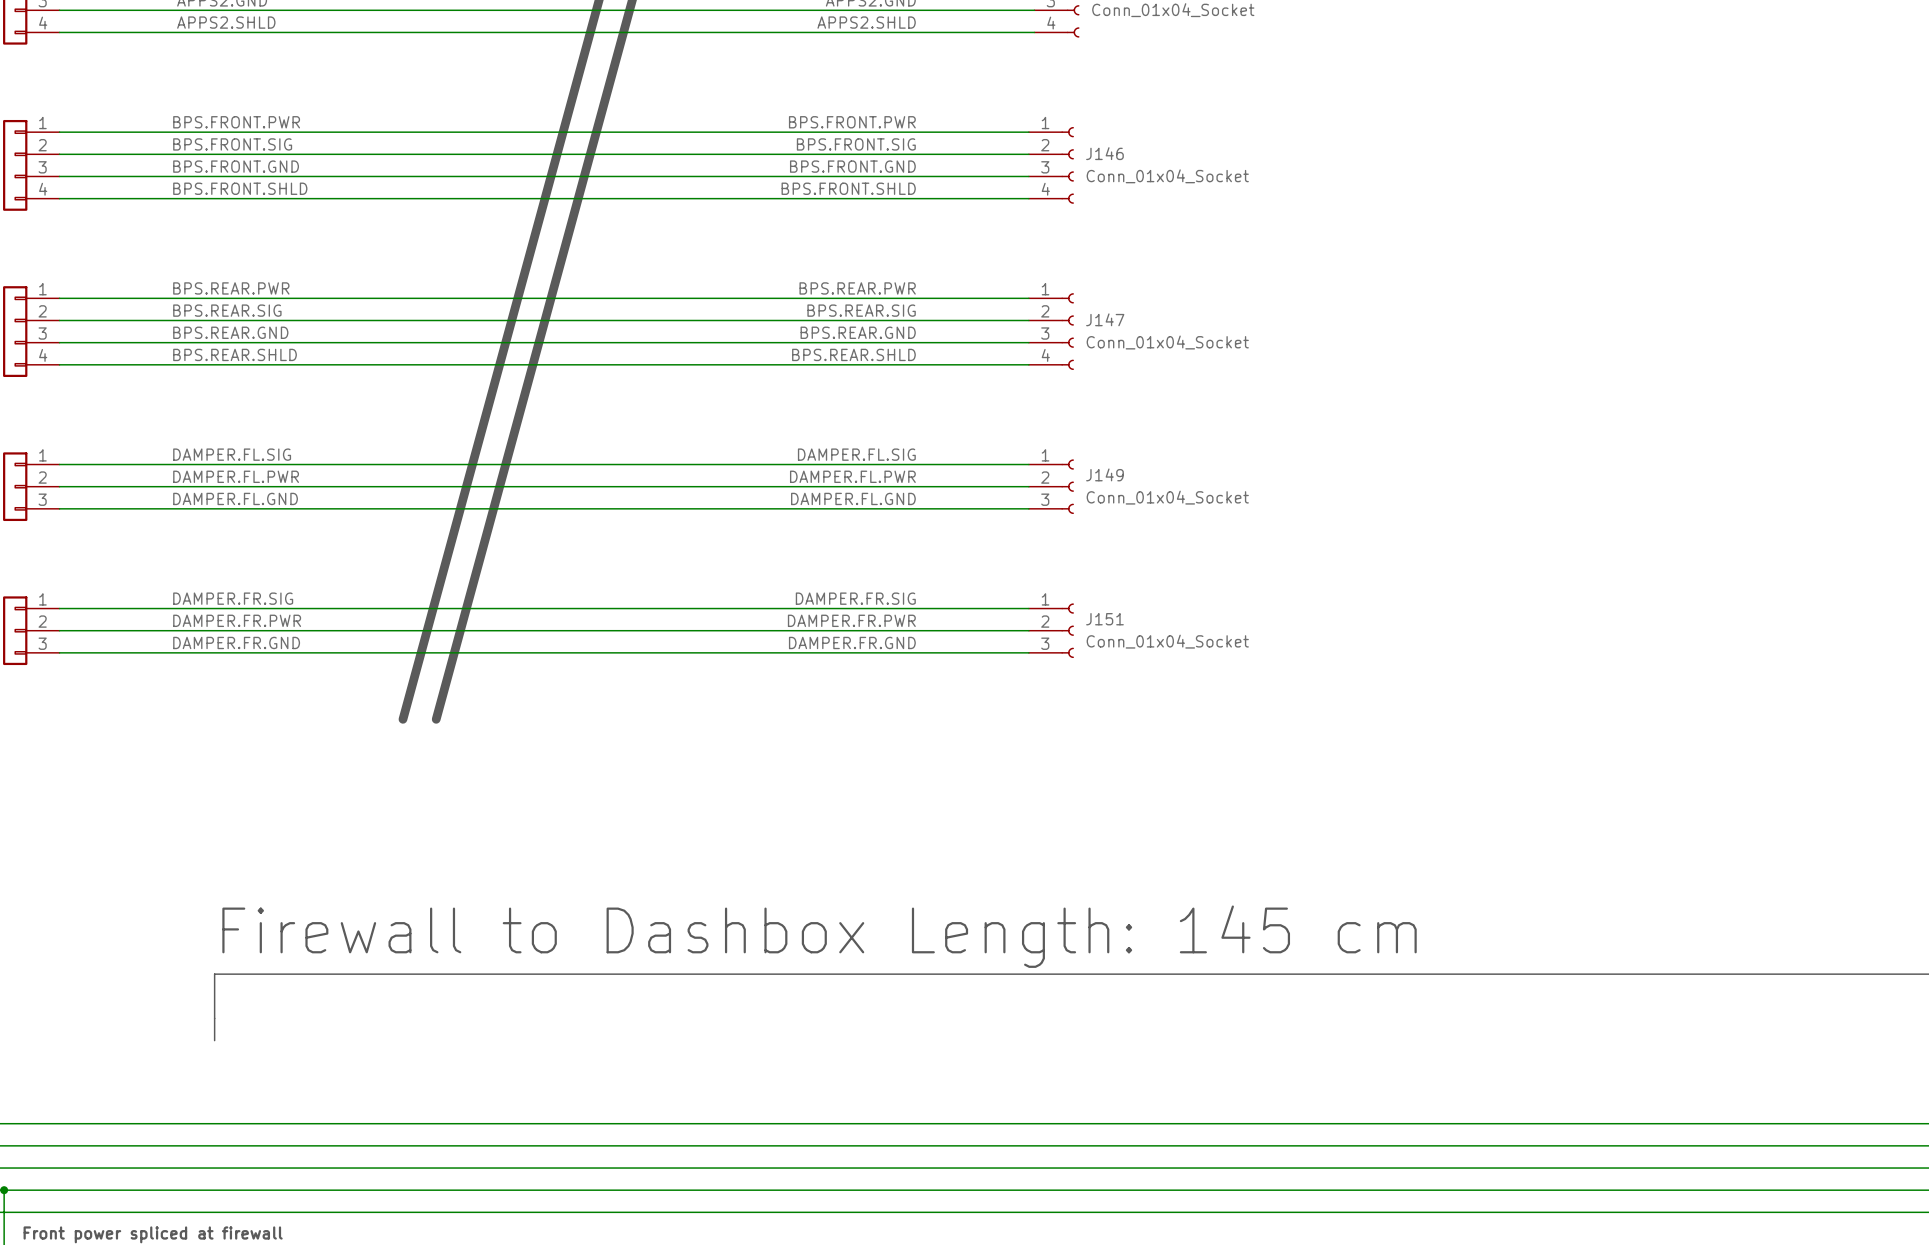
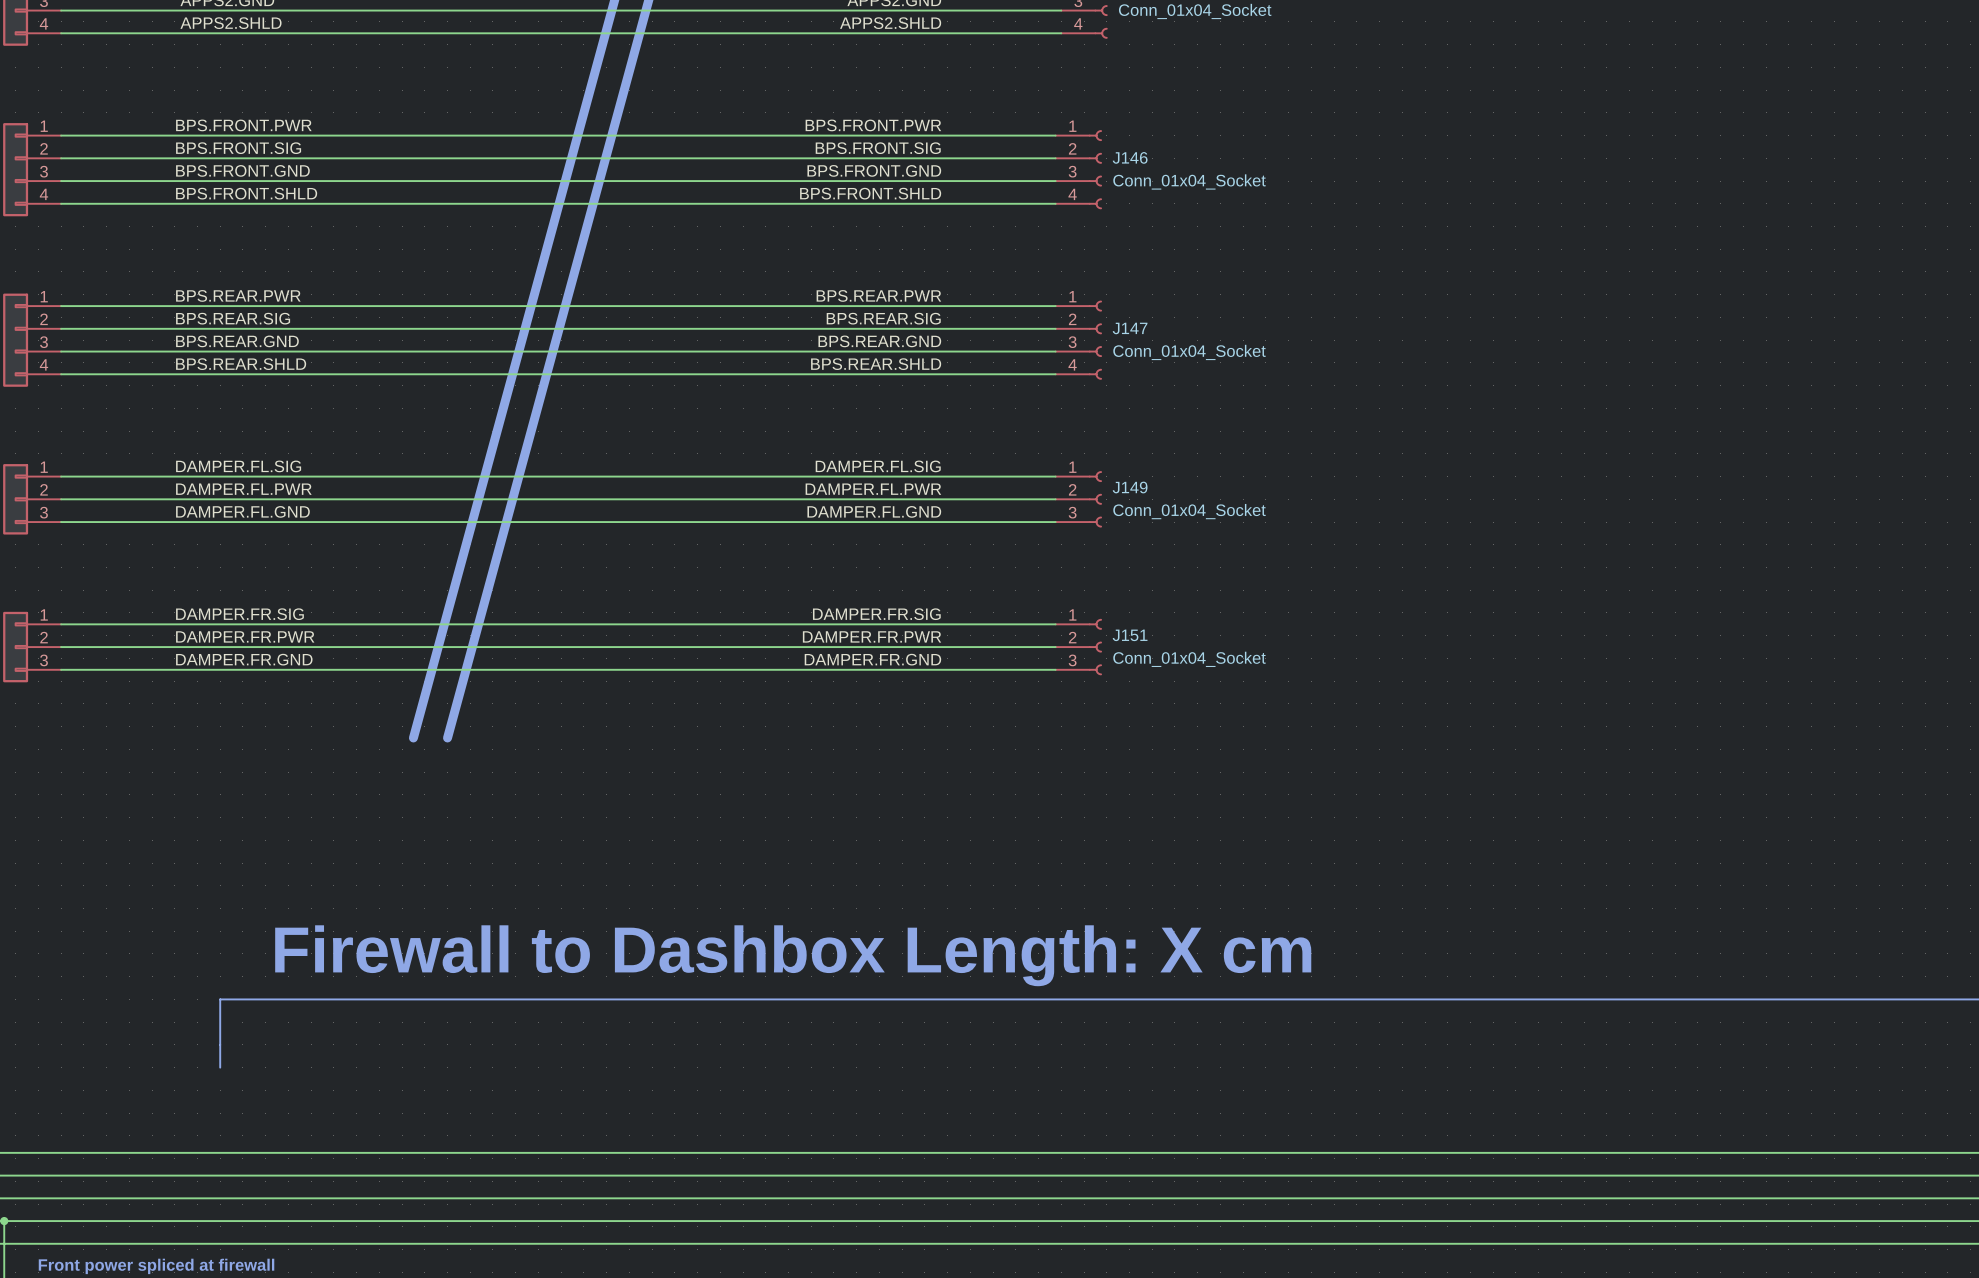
text: Firewall to Dashbox Length: 145 cm (819, 936) -> Firewall to Dashbox Length: X cm (793, 955)

